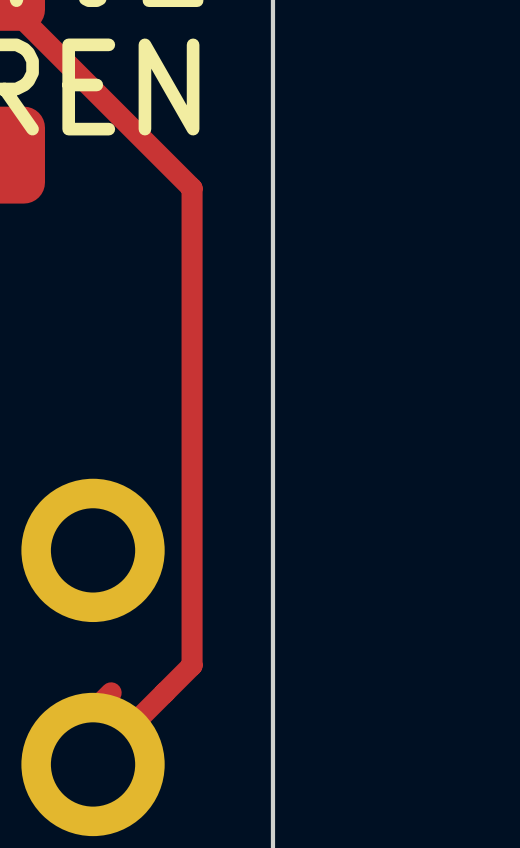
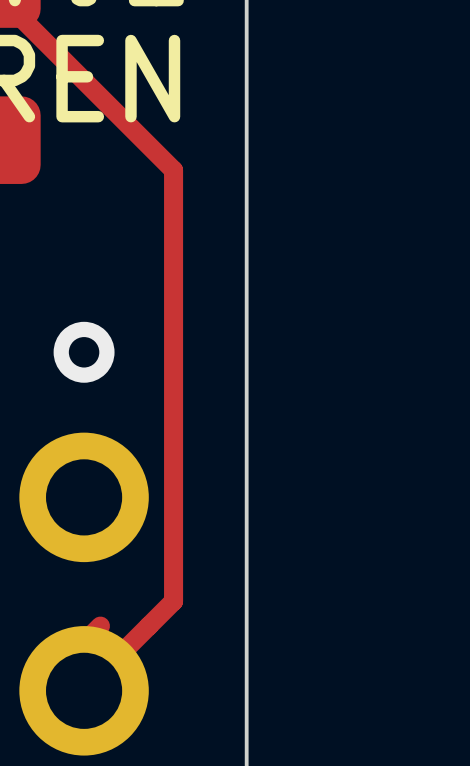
via: none -> (84, 352)

